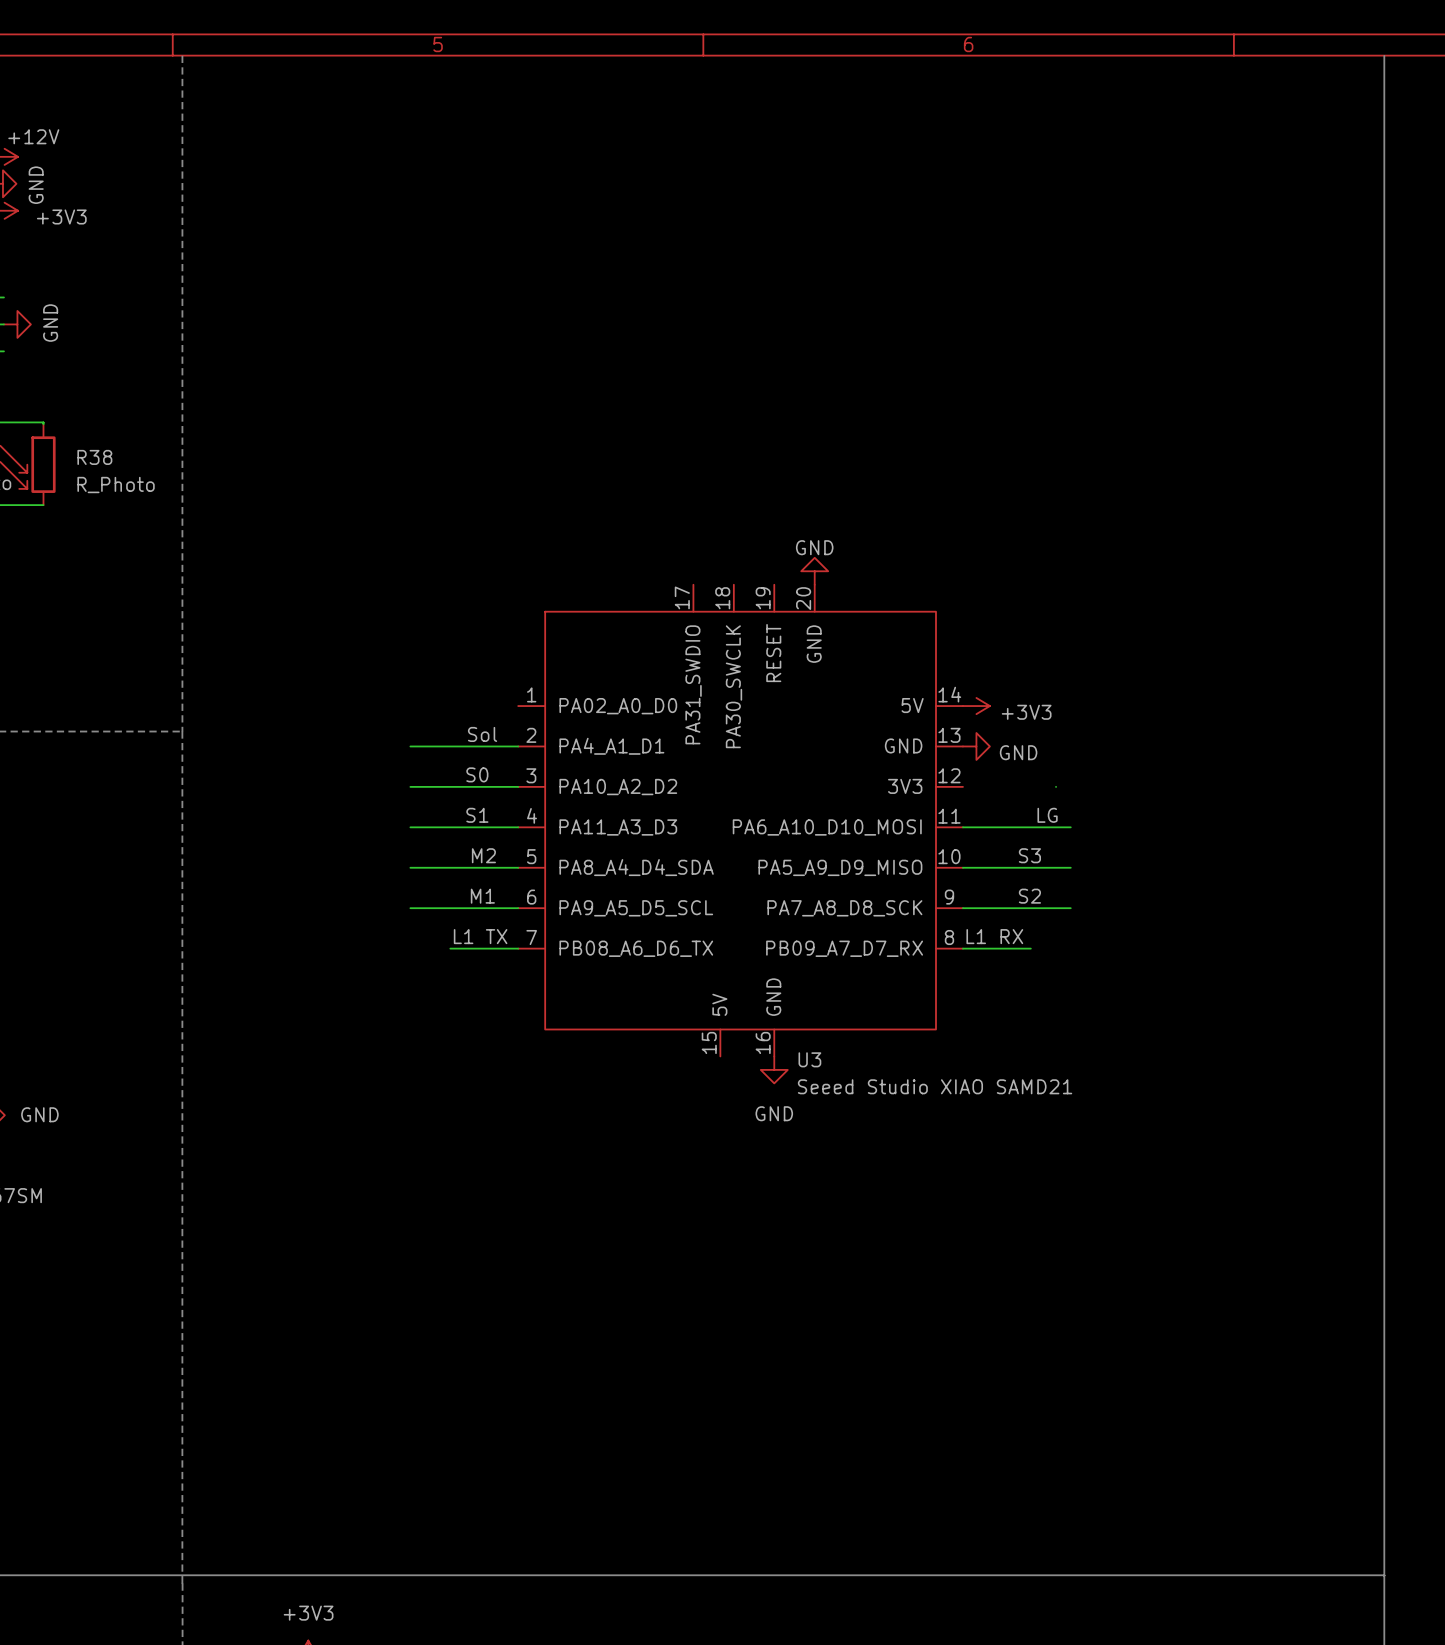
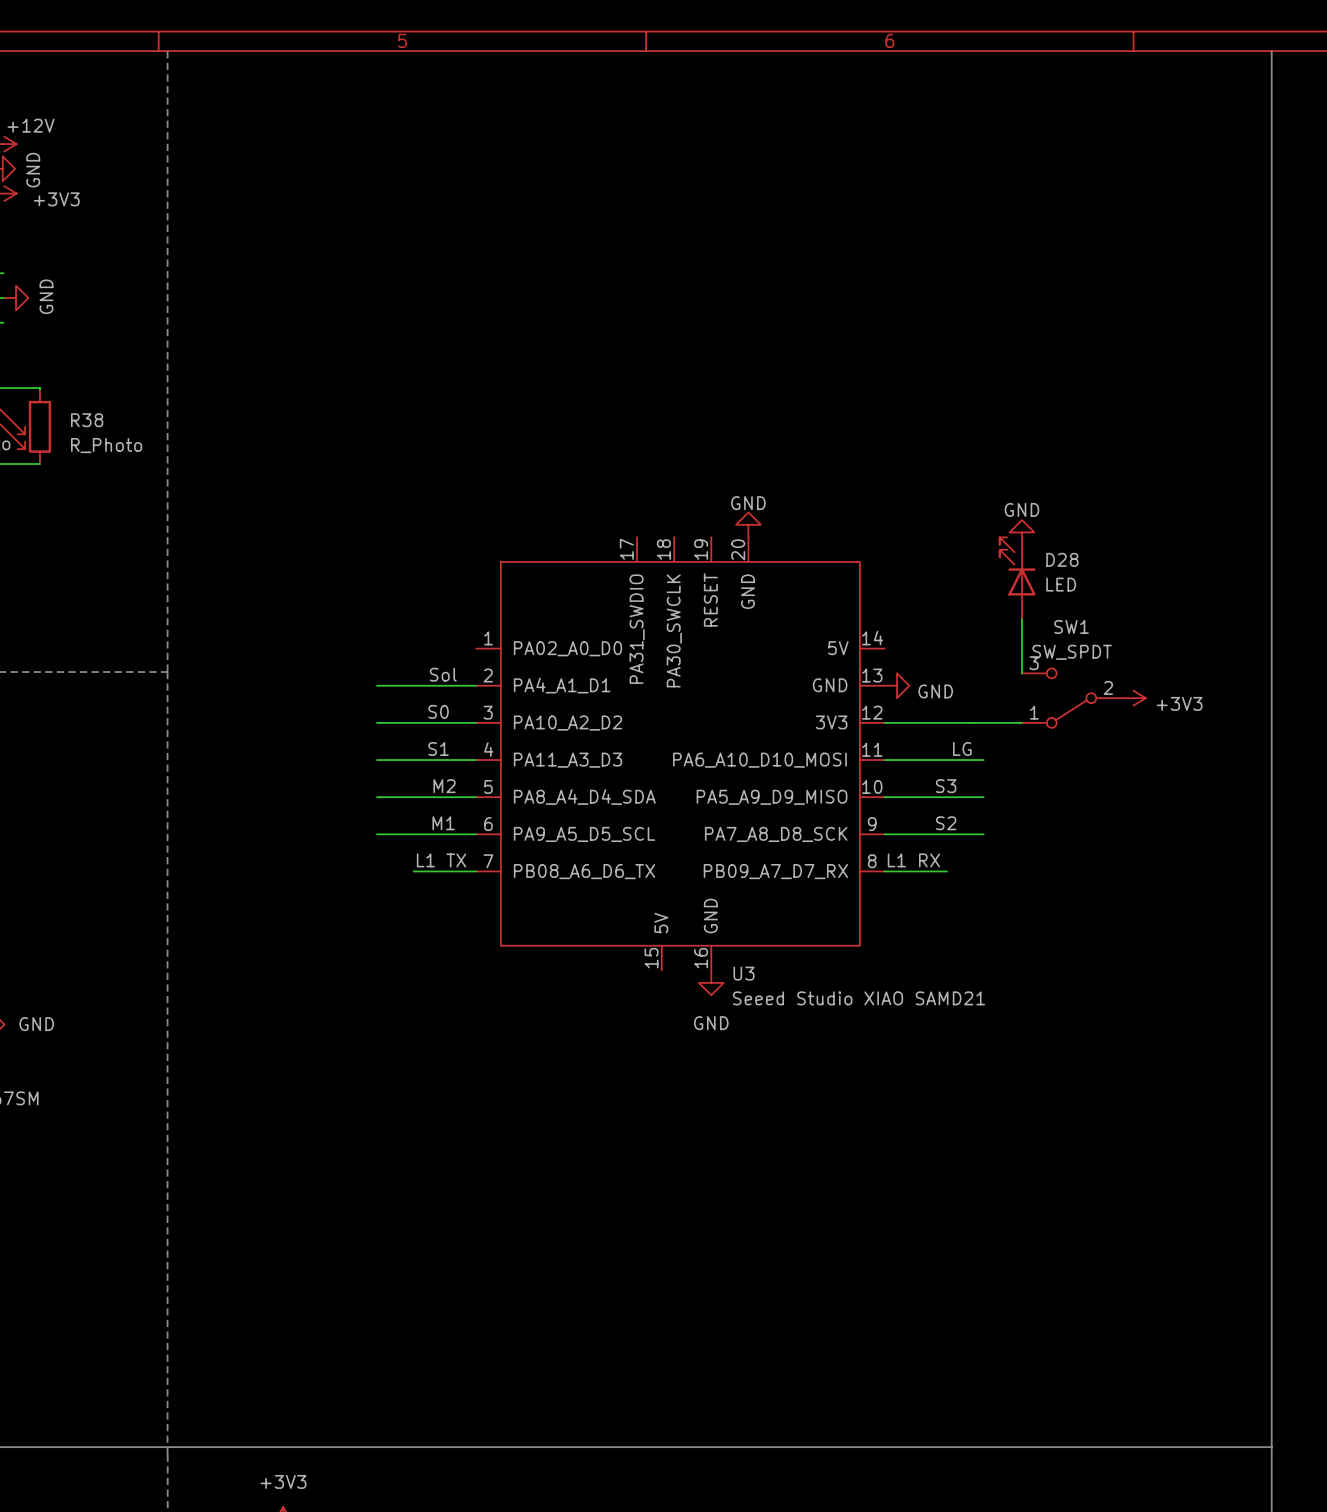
power symbol: none -> GND (1021, 532)
D28: none -> LED (1017, 578)
wire: none -> (1021, 619) (1021, 673)
power symbol position: +3V3 (976, 706) -> +3V3 (1133, 698)
SW1: none -> SW_SPDT (1071, 698)
wire: none -> (884, 722) (970, 722)
wire: none -> (970, 722) (1021, 722)

